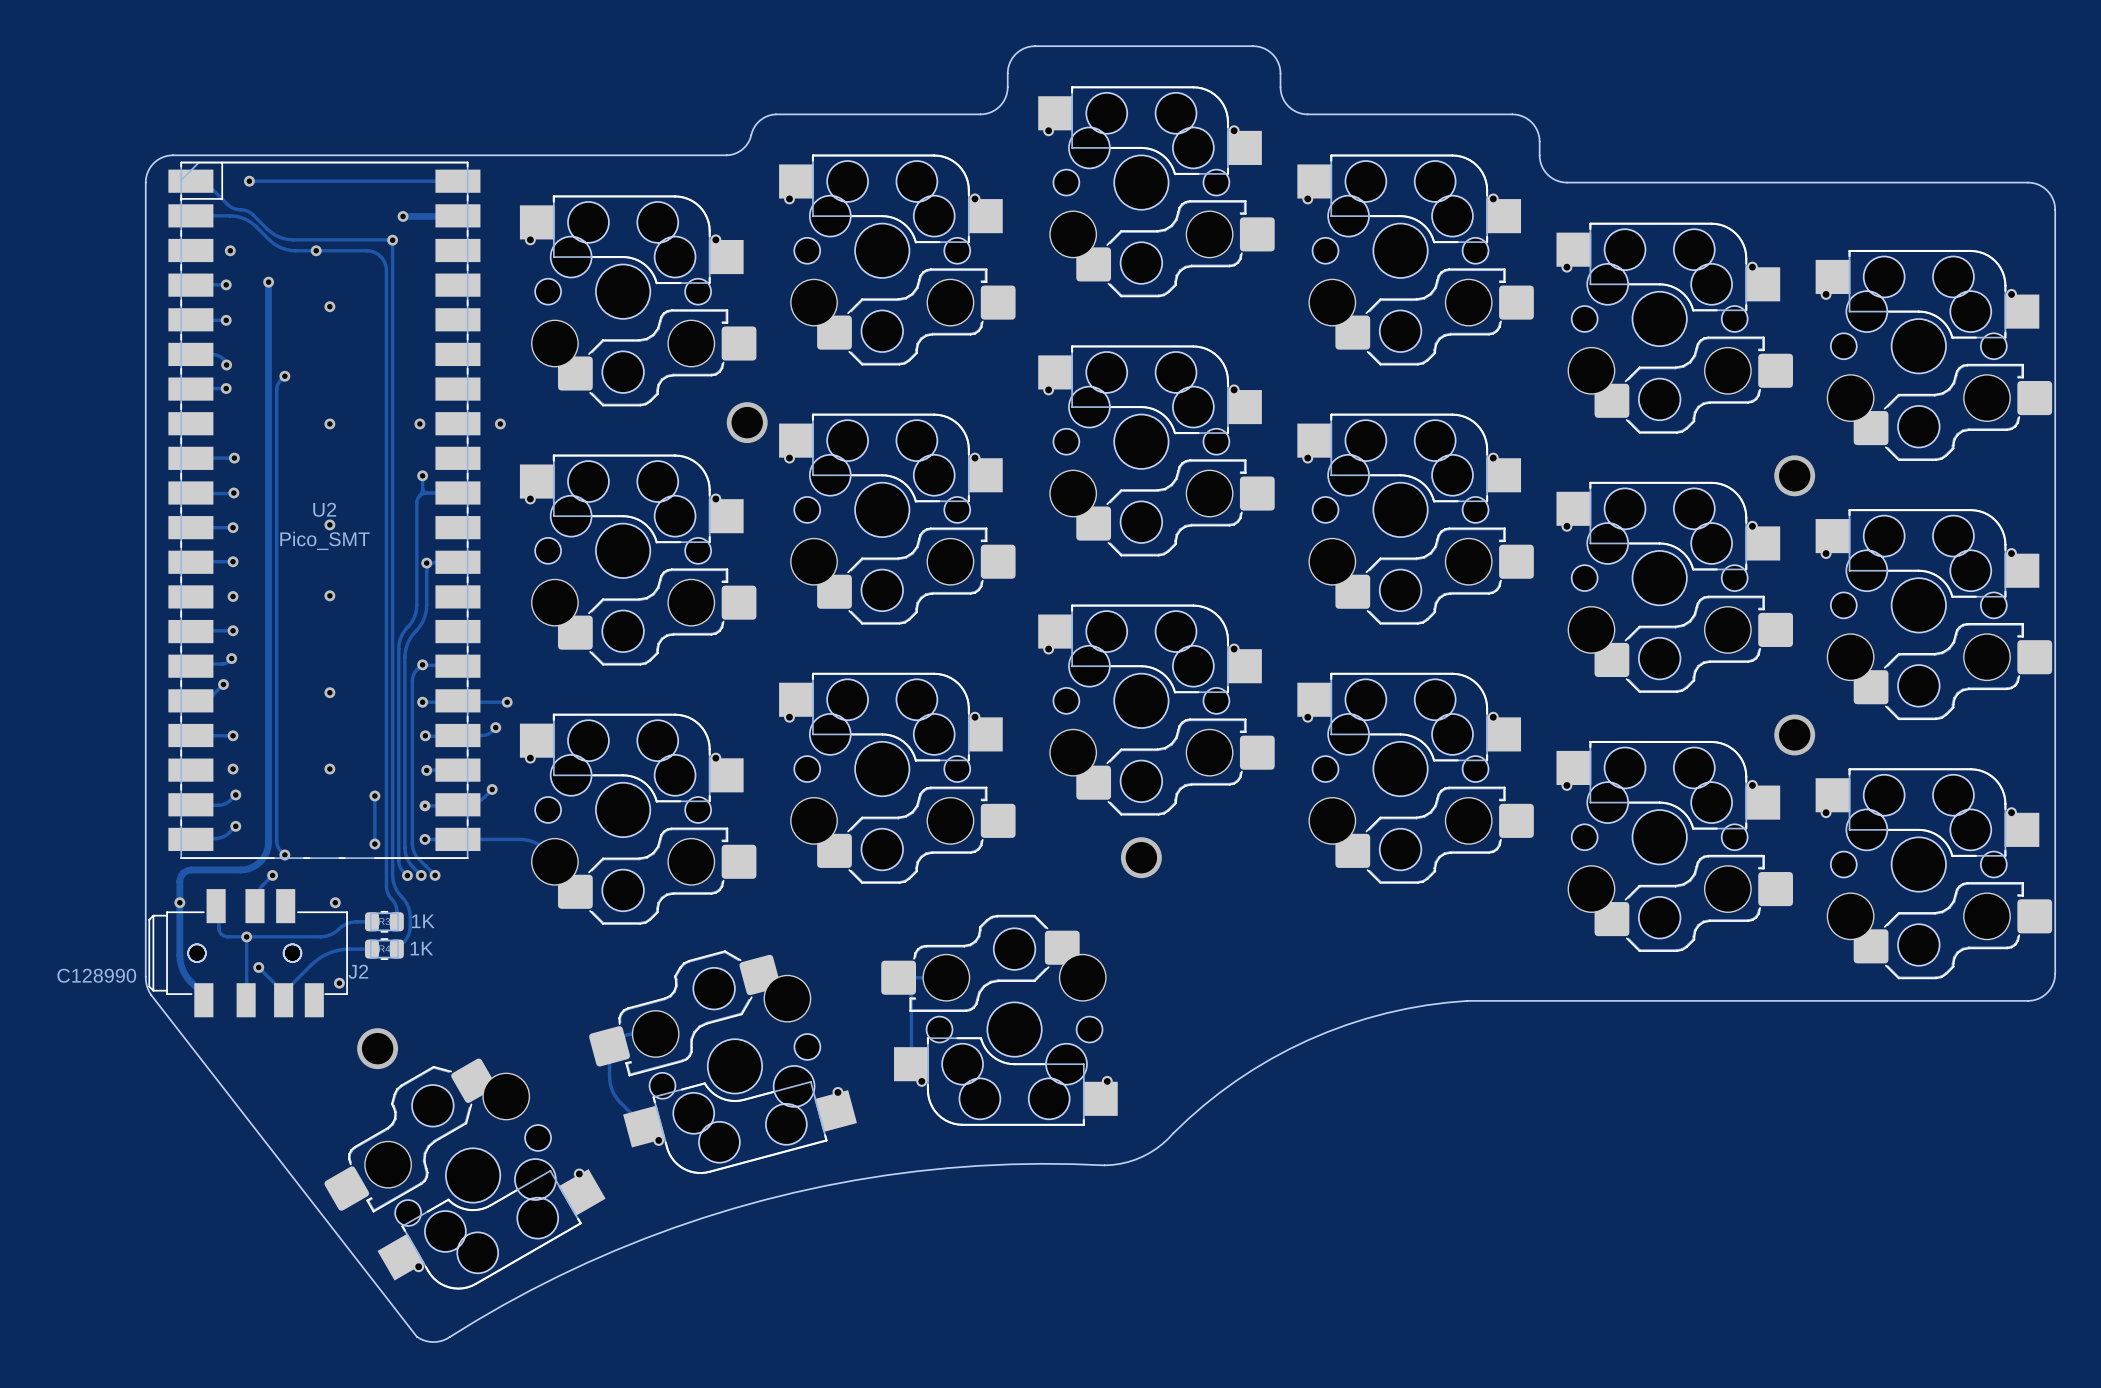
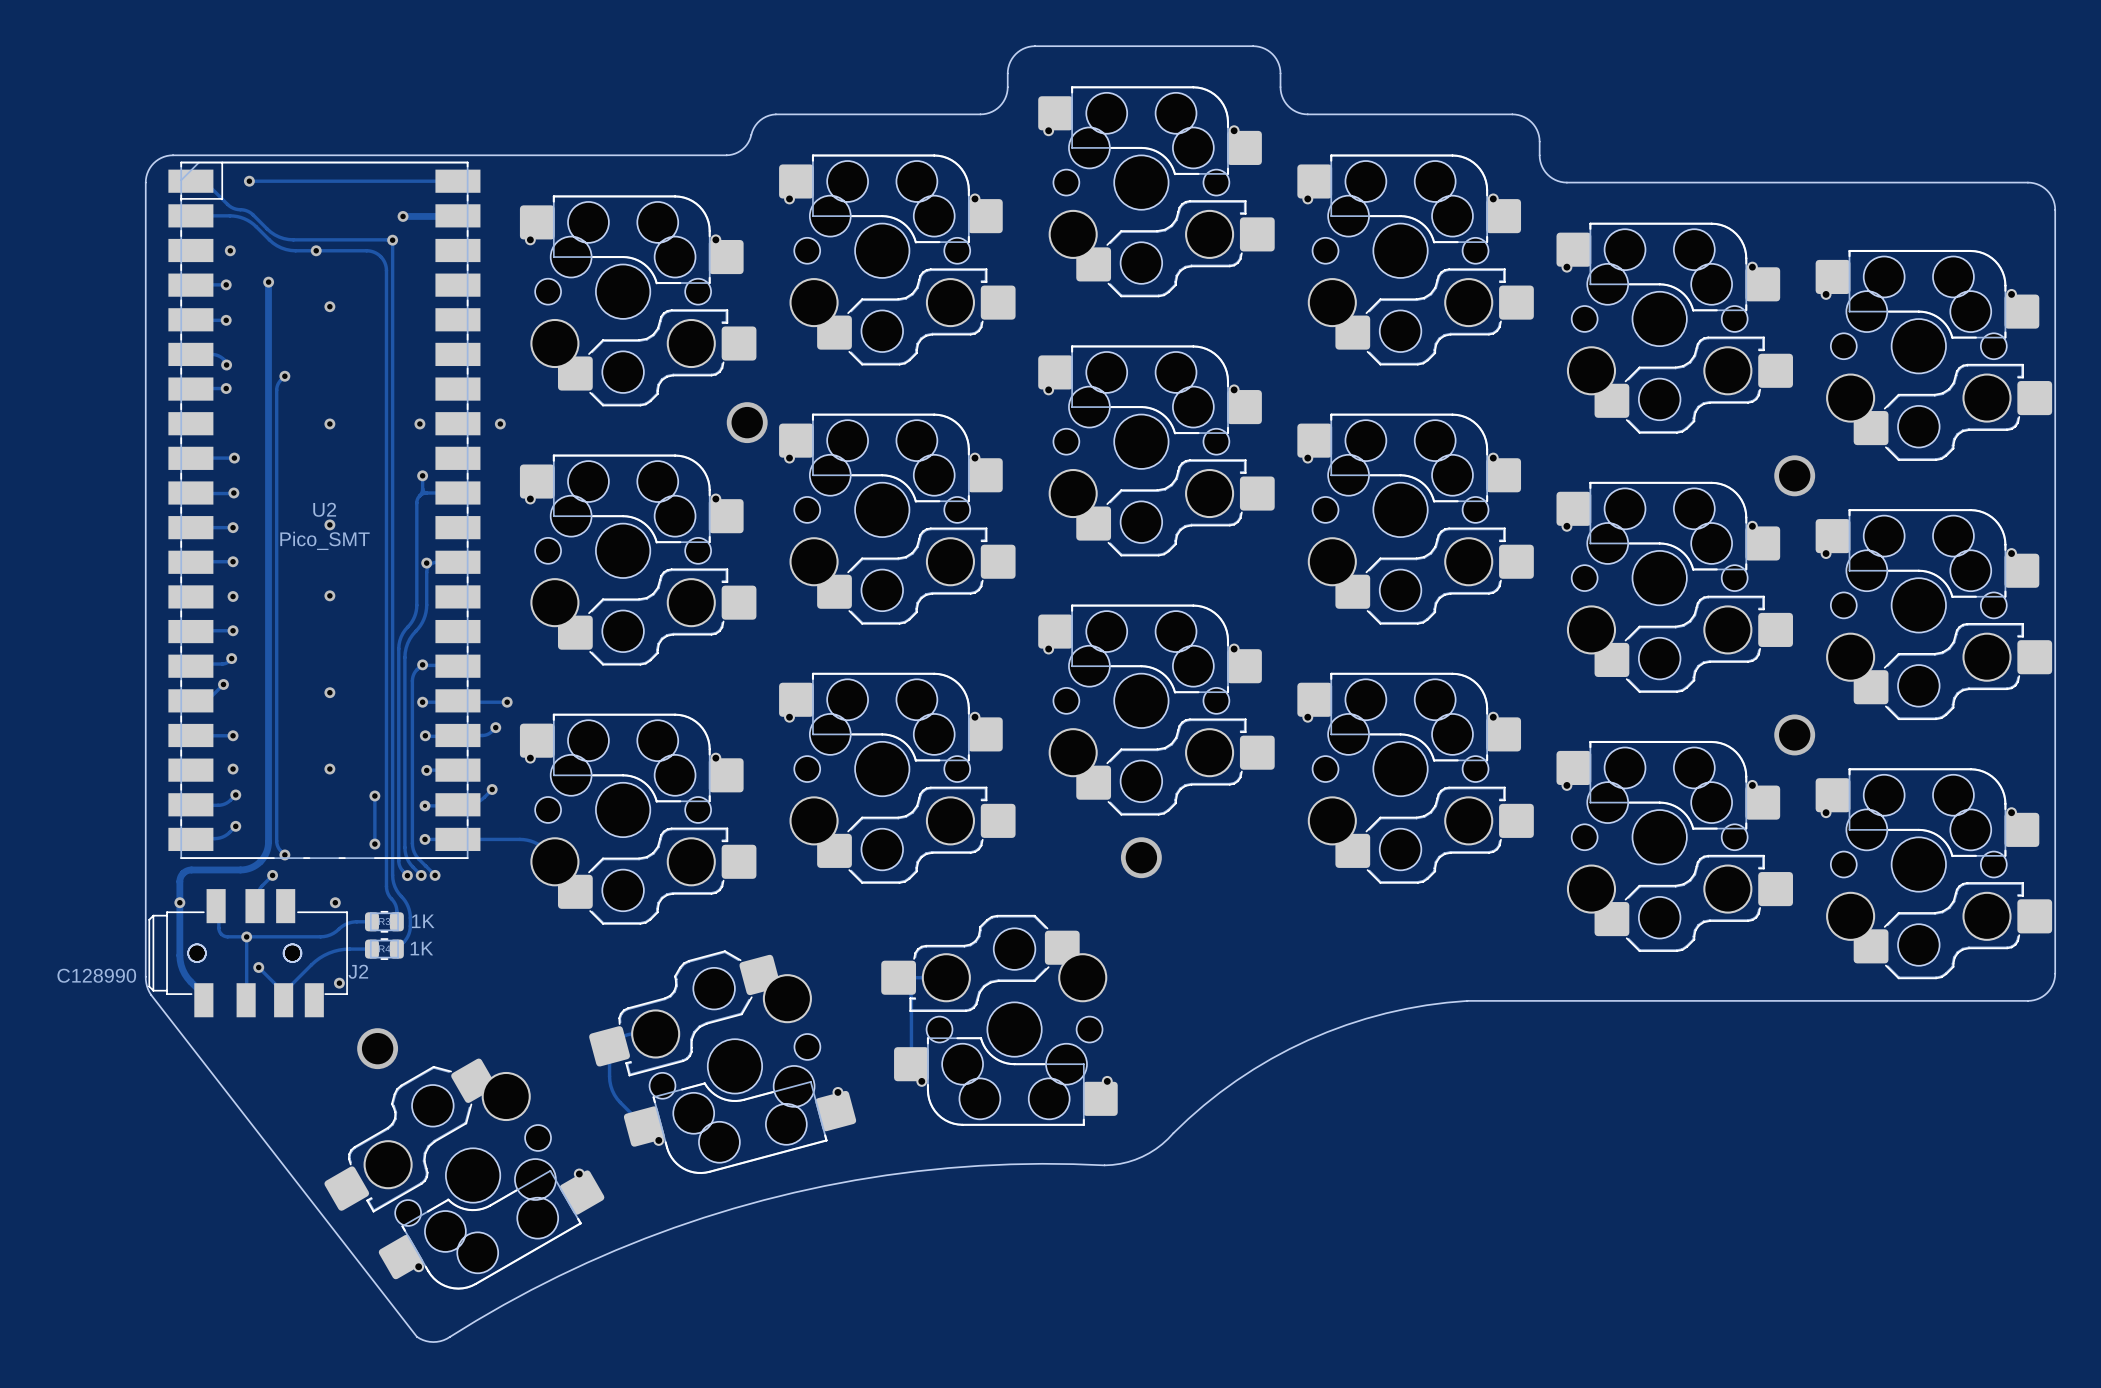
part footprint: [1038, 86, 1275, 298] -> [1038, 86, 1275, 298]
part footprint: [779, 154, 1016, 366] -> [779, 154, 1016, 366]
part footprint: [1297, 154, 1534, 366] -> [1297, 154, 1534, 366]
part footprint: [519, 195, 757, 407] -> [519, 195, 757, 407]
part footprint: [1556, 222, 1793, 434] -> [1556, 222, 1793, 434]
part footprint: [1815, 249, 2053, 461] -> [1815, 249, 2053, 461]
part footprint: [1038, 345, 1275, 557] -> [1038, 345, 1275, 557]
part footprint: [779, 413, 1016, 625] -> [779, 413, 1016, 625]
part footprint: [1297, 413, 1534, 625] -> [1297, 413, 1534, 625]
part footprint: [519, 454, 757, 666] -> [519, 454, 757, 666]
part footprint: [1556, 481, 1793, 693] -> [1556, 481, 1793, 693]
part footprint: [1815, 509, 2053, 721] -> [1815, 509, 2053, 721]
part footprint: [1038, 604, 1275, 816] -> [1038, 604, 1275, 816]
part footprint: [779, 672, 1016, 884] -> [779, 672, 1016, 884]
part footprint: [1297, 672, 1534, 884] -> [1297, 672, 1534, 884]
part footprint: [519, 713, 757, 925] -> [519, 713, 757, 925]
part footprint: [1556, 740, 1793, 952] -> [1556, 740, 1793, 952]
part footprint: [1815, 768, 2053, 980] -> [1815, 768, 2053, 980]
part footprint: [881, 914, 1118, 1126] -> [881, 914, 1118, 1126]
part footprint: [589, 950, 857, 1175] -> [589, 950, 857, 1175]
part footprint: [324, 1058, 606, 1290] -> [324, 1058, 605, 1290]

